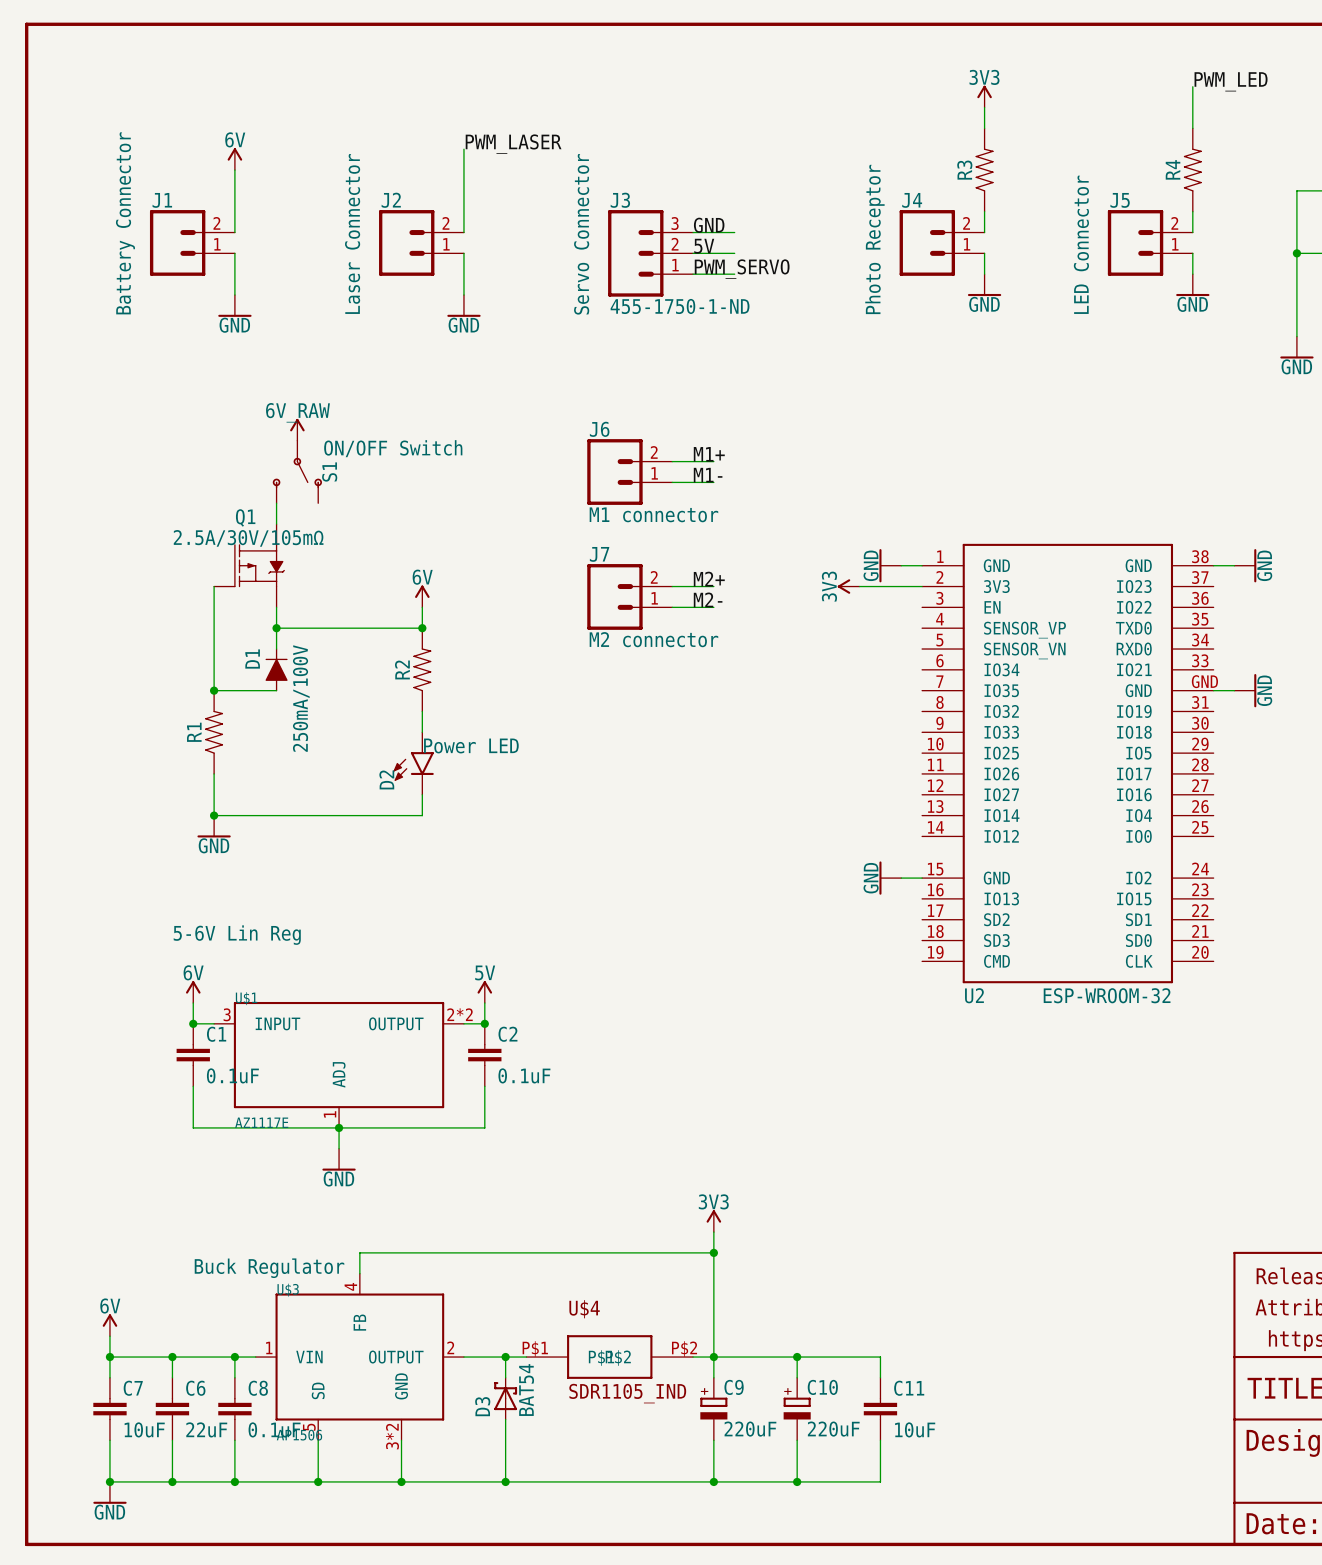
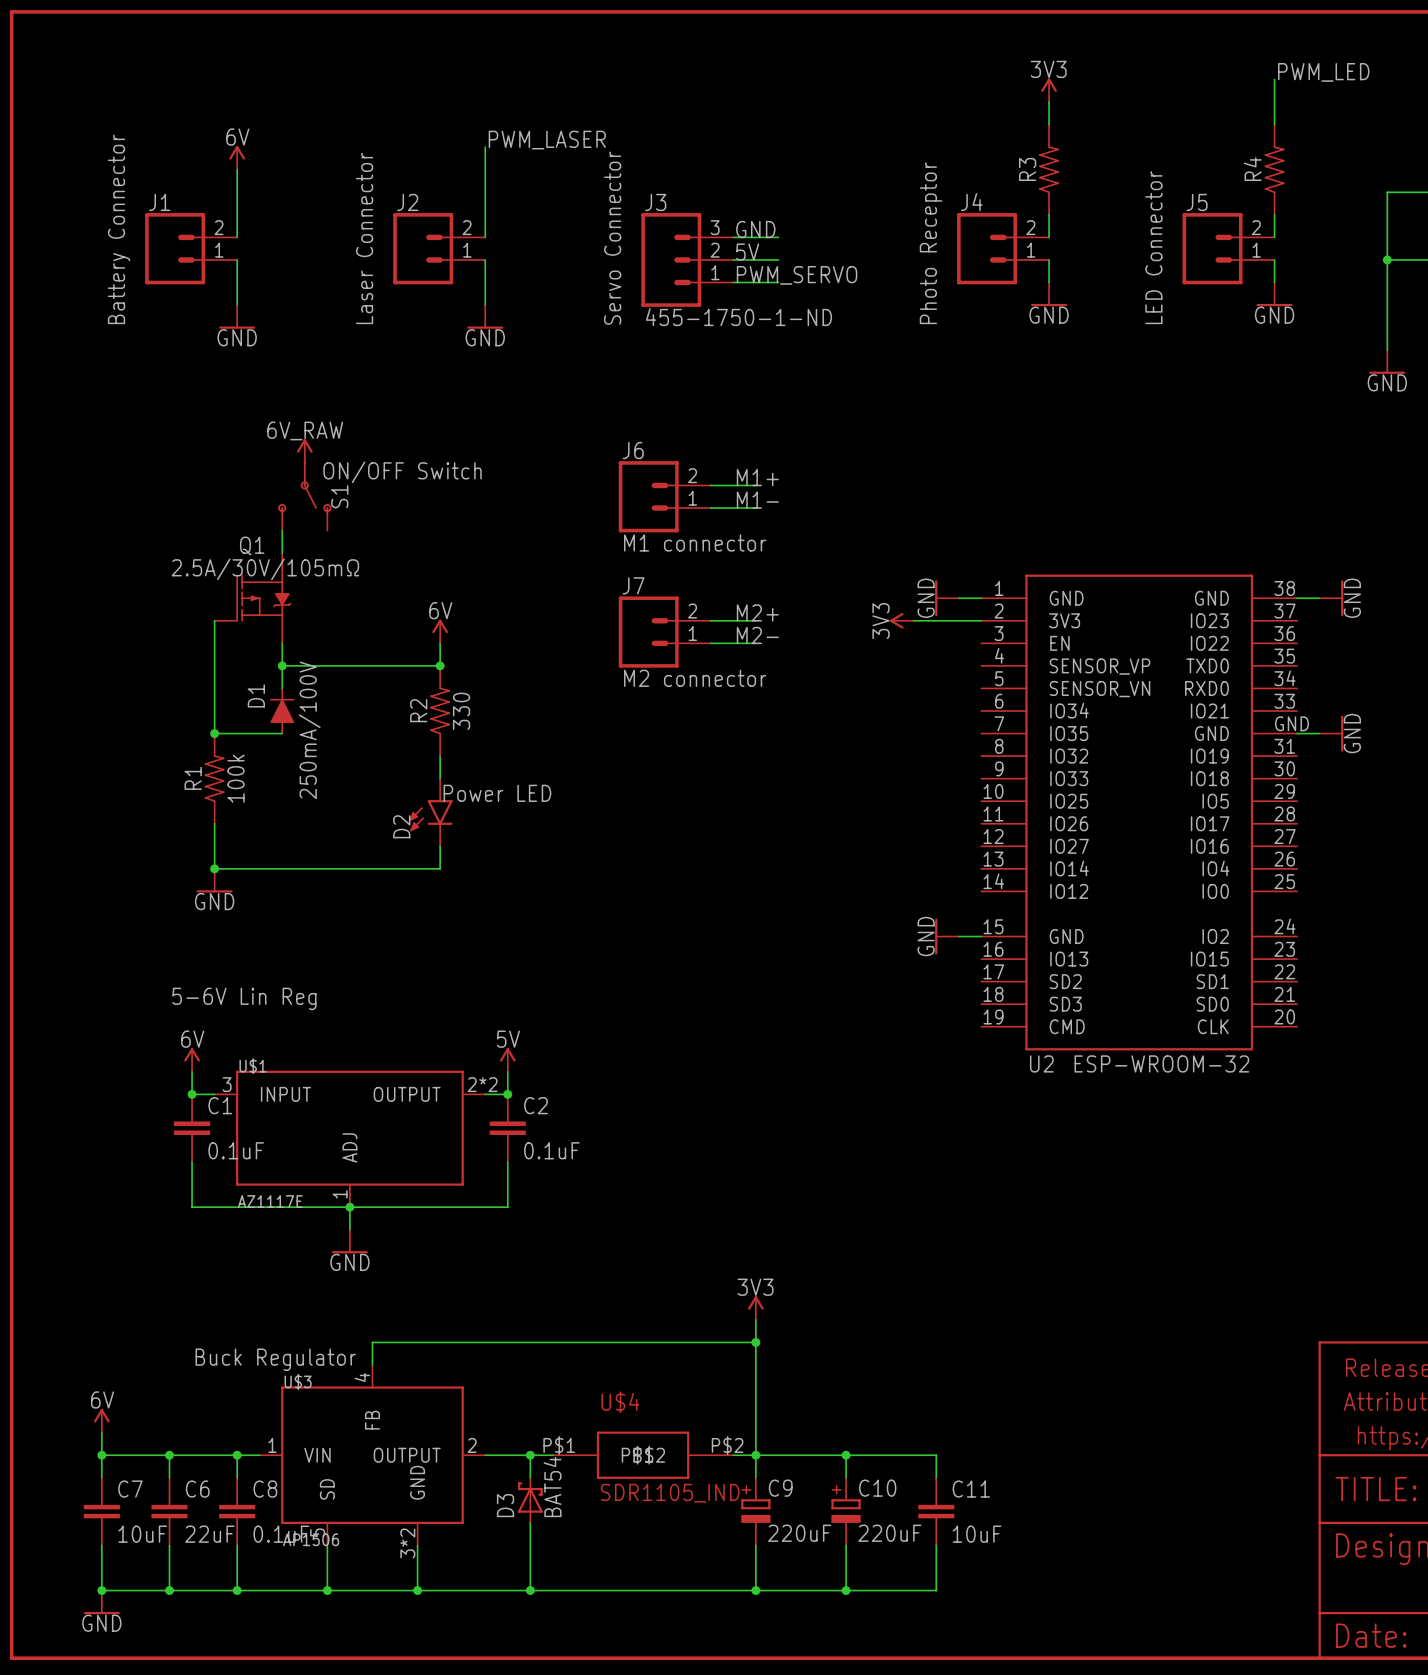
R2 value: none -> 330 (461, 711)
R1 value: none -> 100k (236, 778)

